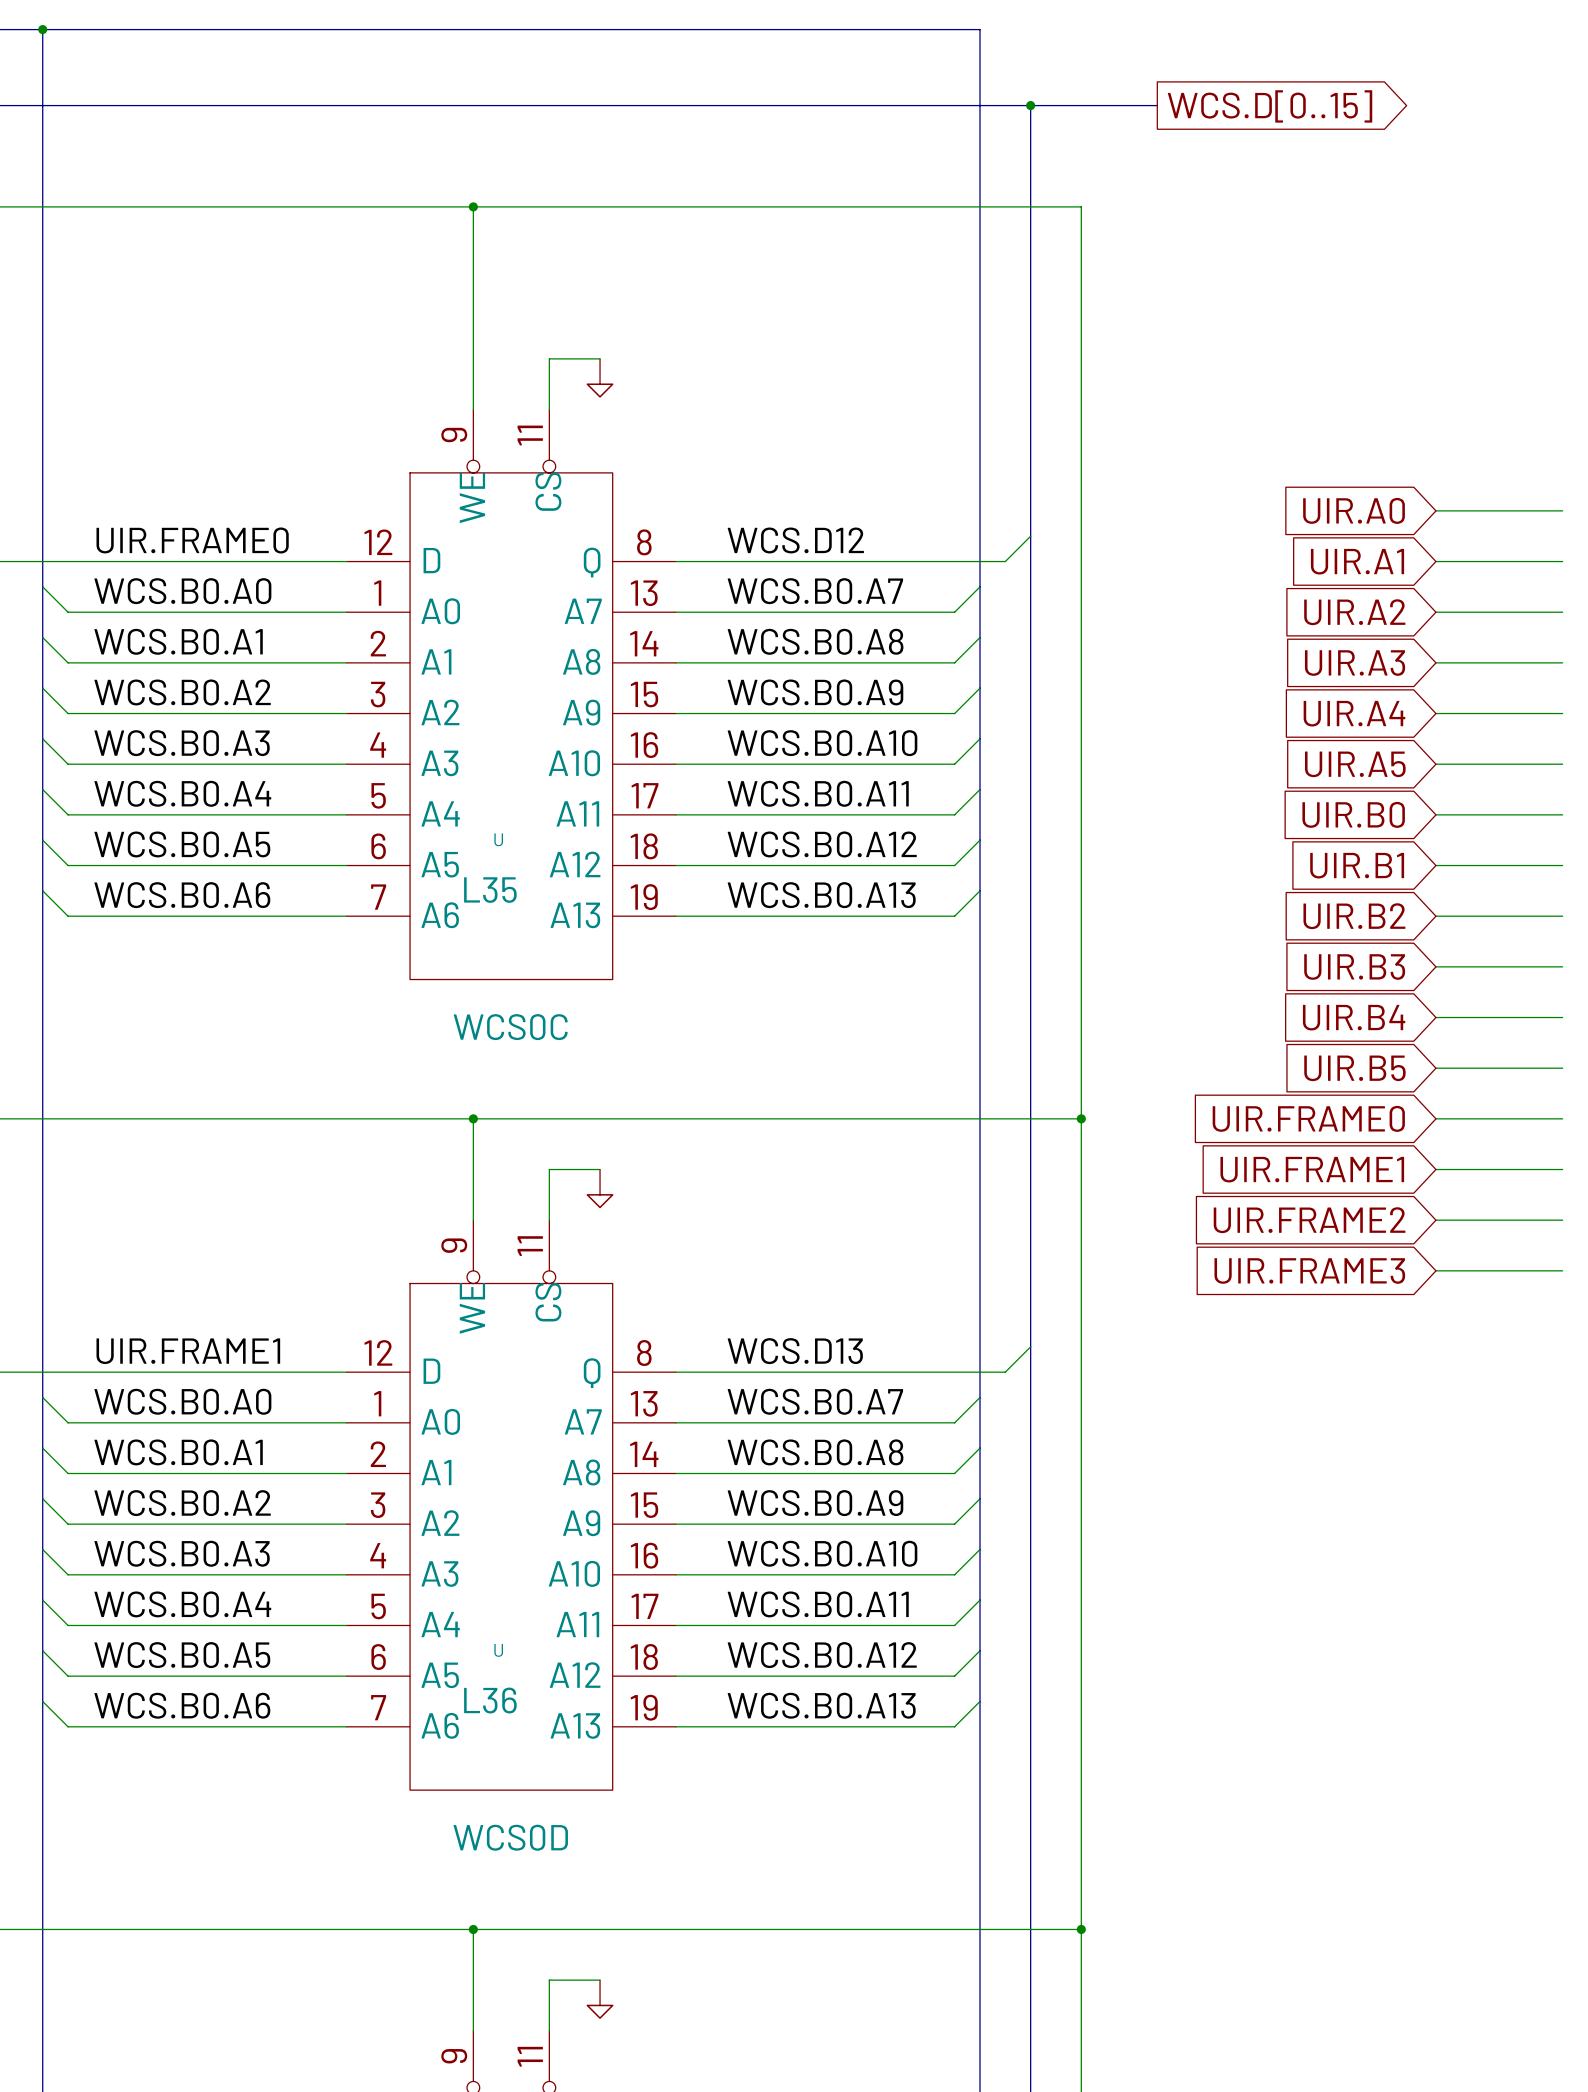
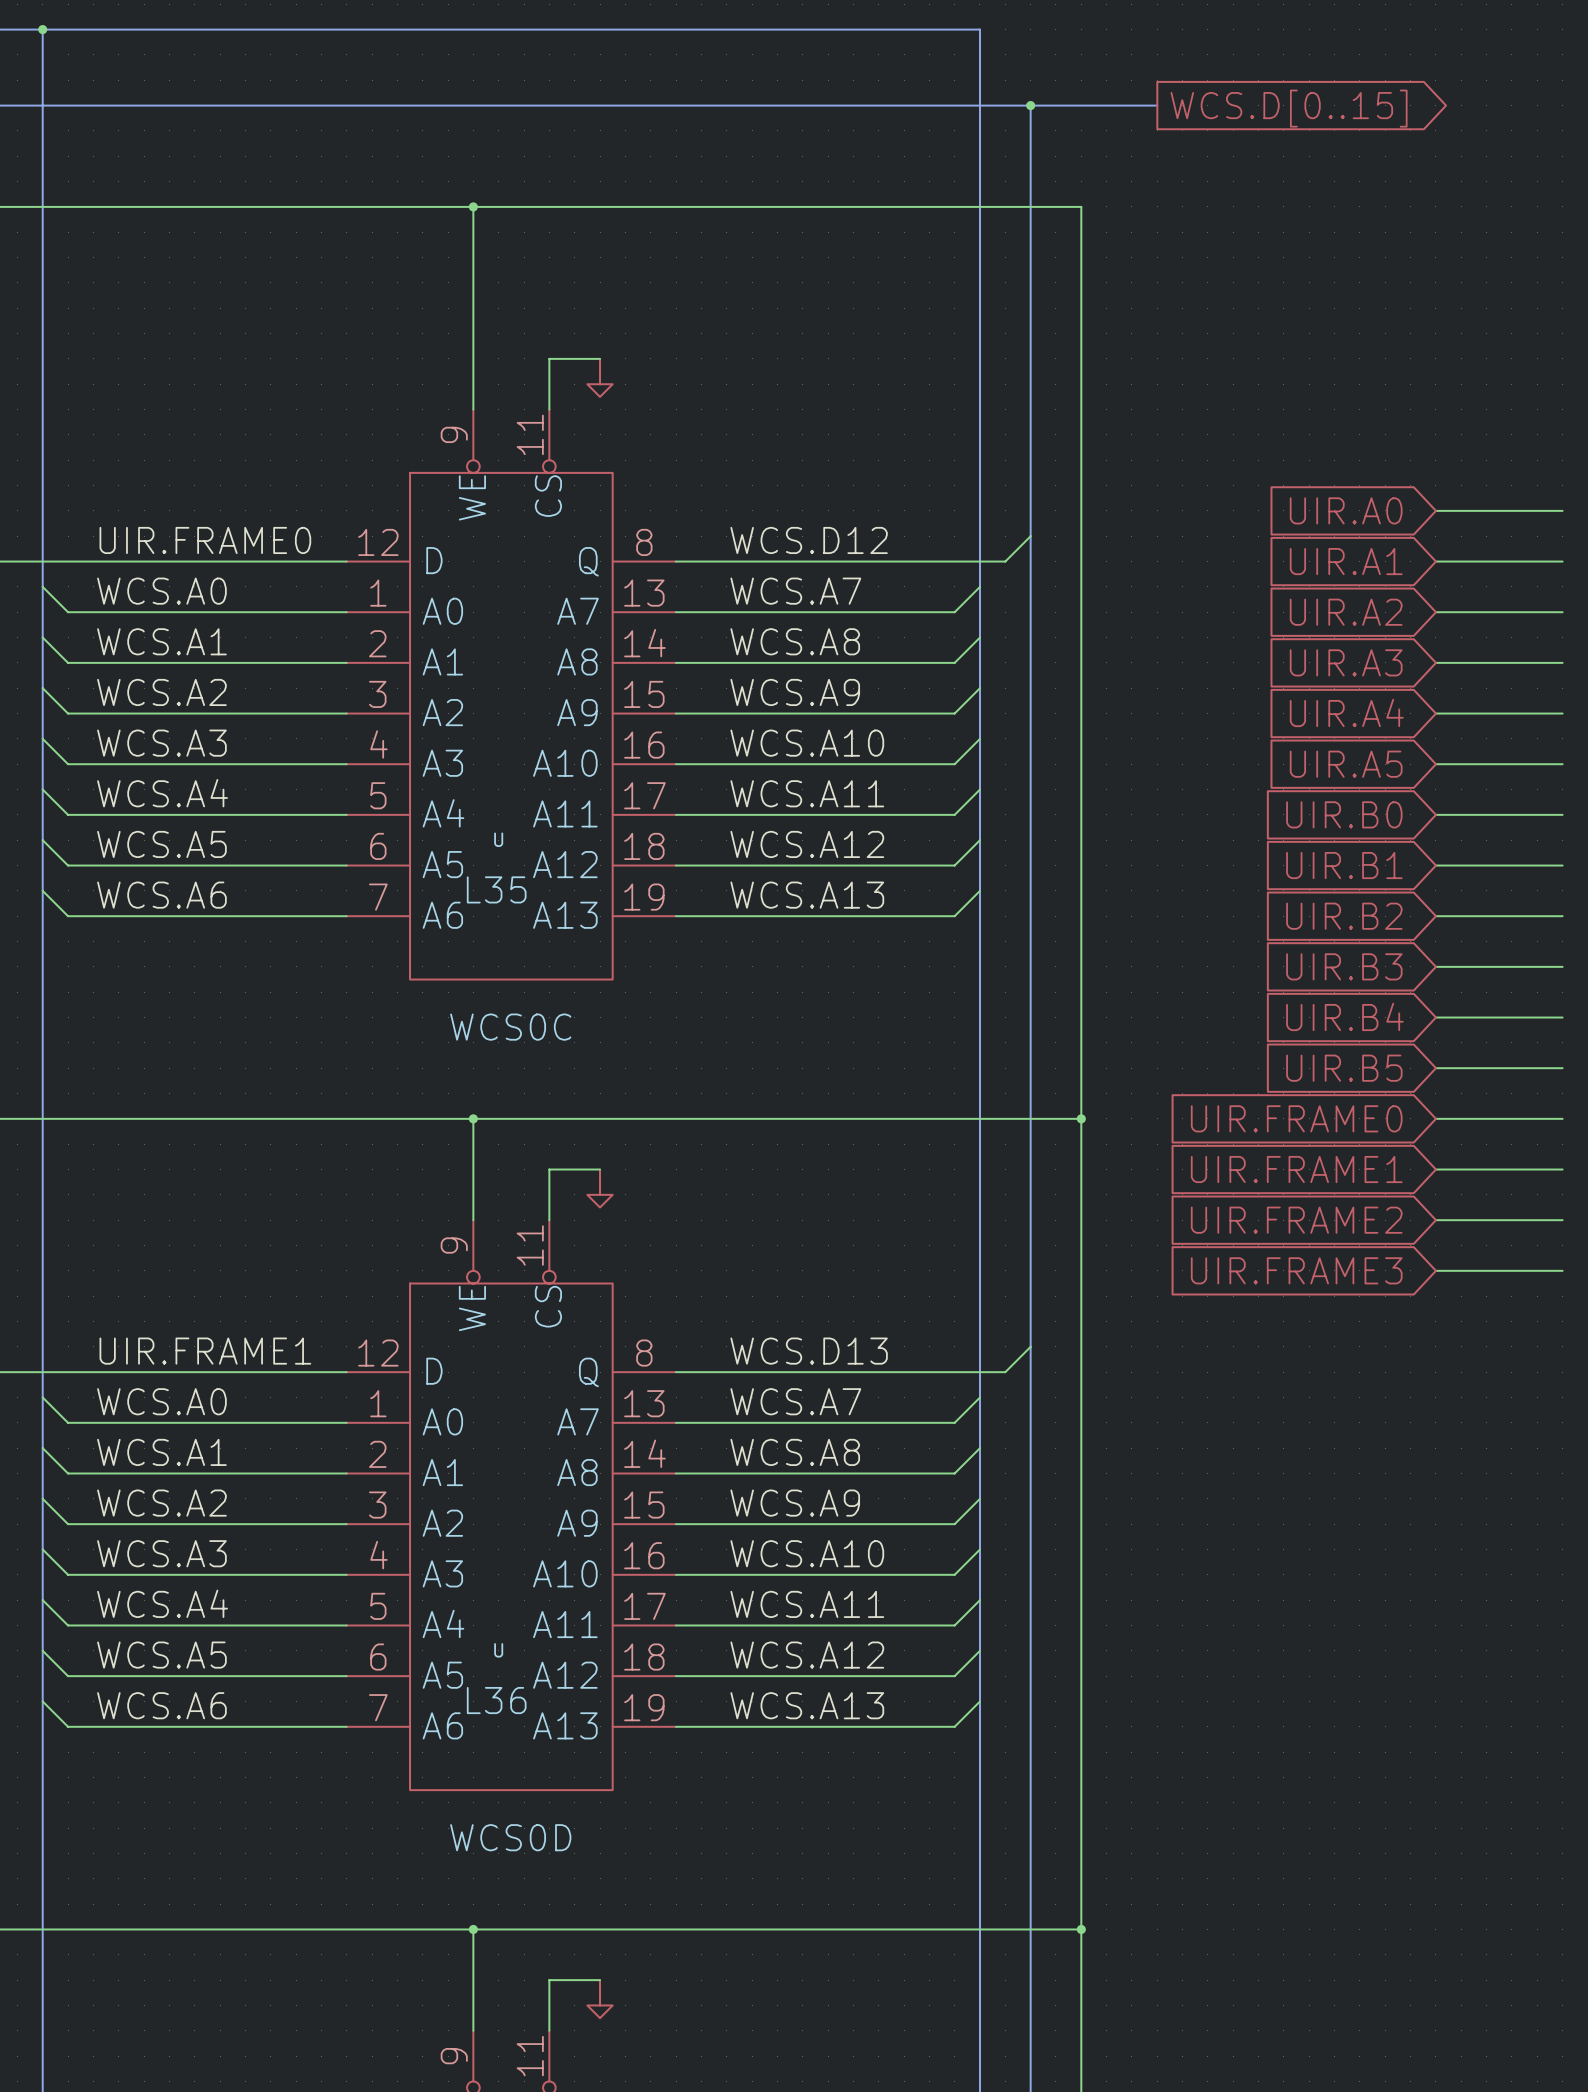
label: WCS.B0.A0 (182, 591) -> WCS.A0 (161, 591)
label: WCS.B0.A7 (815, 591) -> WCS.A7 (795, 591)
label: WCS.B0.A1 (178, 641) -> WCS.A1 (161, 641)
label: WCS.B0.A8 (815, 641) -> WCS.A8 (795, 641)
label: WCS.B0.A2 (182, 692) -> WCS.A2 (161, 692)
label: WCS.B0.A9 (815, 692) -> WCS.A9 (795, 692)
label: WCS.B0.A3 (182, 743) -> WCS.A3 (161, 743)
label: WCS.B0.A10 (822, 743) -> WCS.A10 (807, 743)
label: WCS.B0.A4 (182, 793) -> WCS.A4 (162, 793)
label: WCS.B0.A11 (818, 793) -> WCS.A11 (807, 793)
label: WCS.B0.A5 (182, 844) -> WCS.A5 (161, 844)
label: WCS.B0.A12 (822, 844) -> WCS.A12 (807, 844)
label: WCS.B0.A6 (182, 895) -> WCS.A6 (161, 895)
label: WCS.B0.A13 (821, 895) -> WCS.A13 (807, 895)
label: WCS.B0.A0 (182, 1401) -> WCS.A0 (161, 1401)
label: WCS.B0.A7 (815, 1401) -> WCS.A7 (795, 1401)
label: WCS.B0.A1 (178, 1452) -> WCS.A1 (161, 1452)
label: WCS.B0.A8 (815, 1452) -> WCS.A8 (795, 1452)
label: WCS.B0.A2 (182, 1503) -> WCS.A2 (161, 1503)
label: WCS.B0.A9 (815, 1503) -> WCS.A9 (795, 1503)
label: WCS.B0.A3 (182, 1553) -> WCS.A3 (161, 1553)
label: WCS.B0.A10 (822, 1553) -> WCS.A10 (807, 1553)
label: WCS.B0.A4 (182, 1604) -> WCS.A4 (162, 1603)
label: WCS.B0.A11 (818, 1604) -> WCS.A11 (807, 1604)
label: WCS.B0.A5 (182, 1655) -> WCS.A5 (161, 1655)
label: WCS.B0.A12 (822, 1655) -> WCS.A12 (807, 1655)
label: WCS.B0.A6 (182, 1705) -> WCS.A6 (161, 1705)
label: WCS.B0.A13 (821, 1705) -> WCS.A13 (807, 1705)

